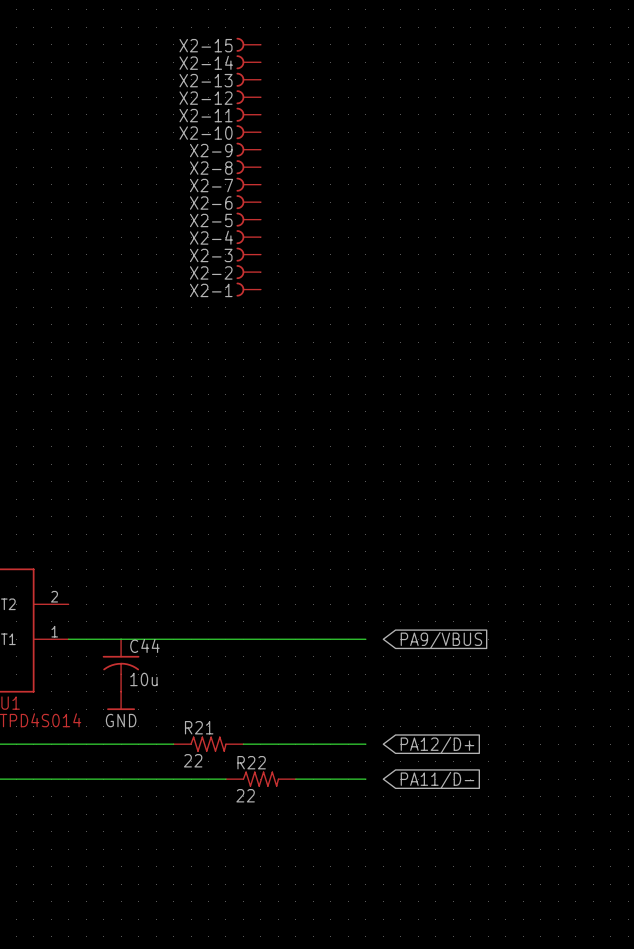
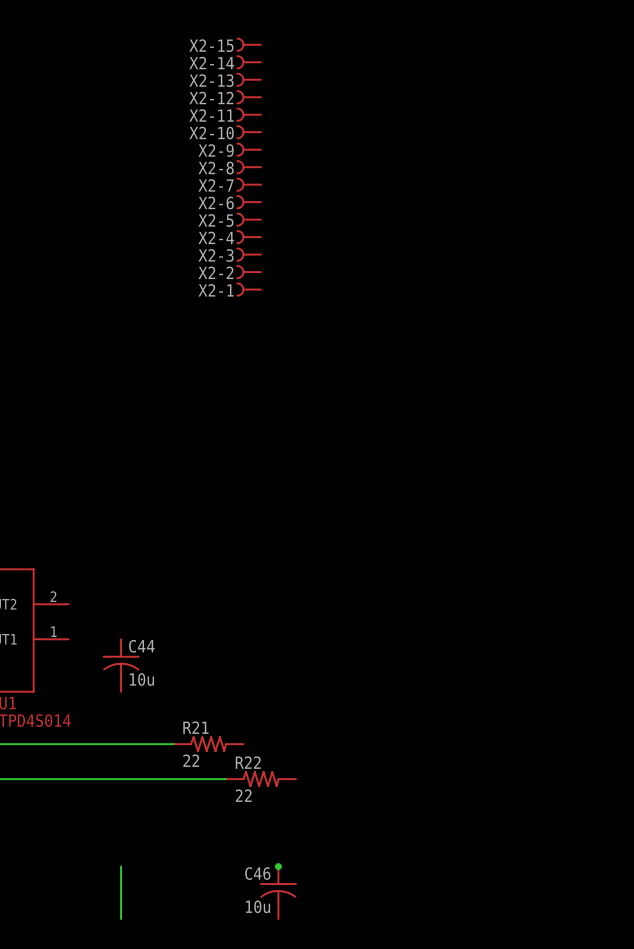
wire: (68, 639) (365, 639) -> none
global label: PA9/VBUS (441, 640) -> none
power symbol: GND (121, 700) -> none
wire: (243, 744) (365, 744) -> none
global label: PA12/D+ (437, 745) -> none
wire: (295, 779) (365, 779) -> none
global label: PA11/D- (437, 780) -> none
wire: none -> (121, 866) (121, 919)
junction: none -> (278, 866)
C46: none -> 10u (278, 892)

